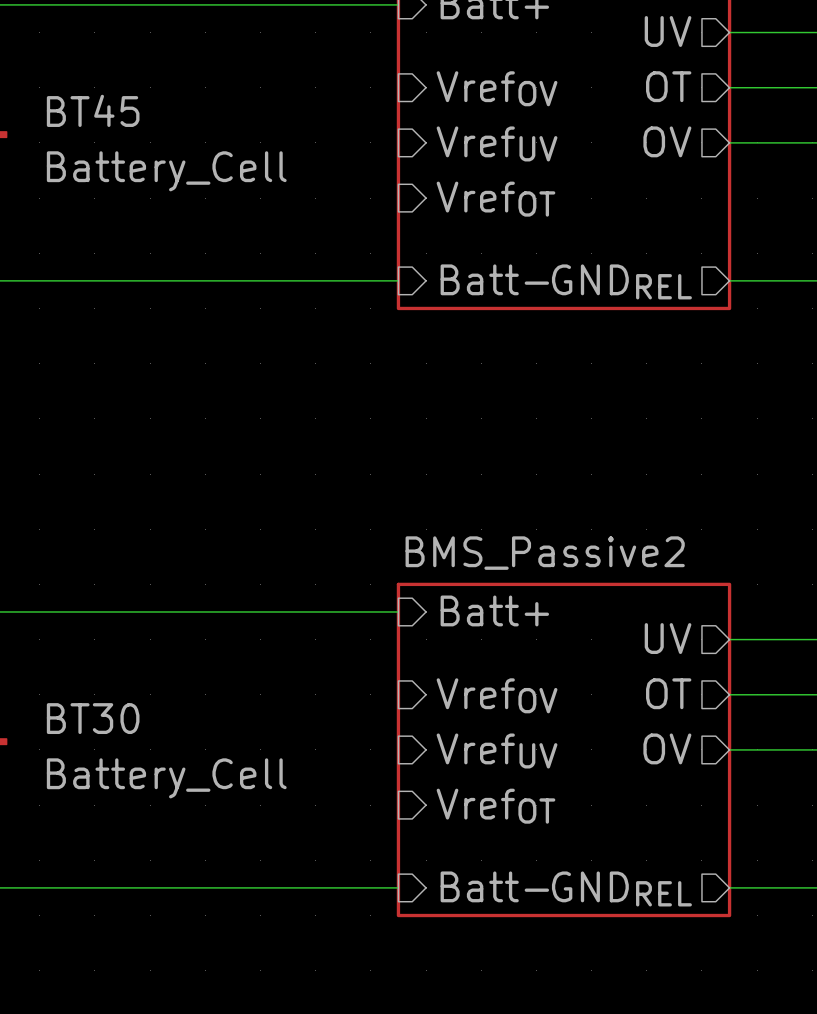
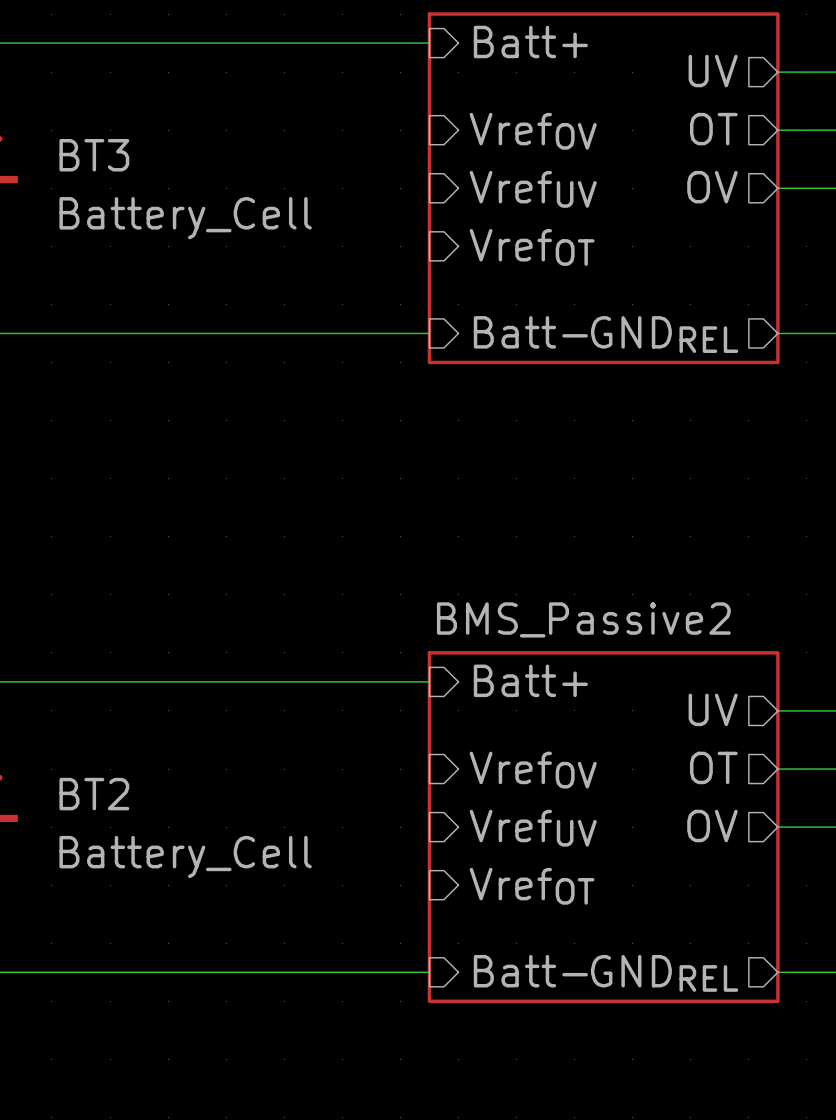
BT45 name: BT45 (93, 110) -> BT3 (94, 155)
BT30 name: BT30 (93, 718) -> BT2 (94, 794)

